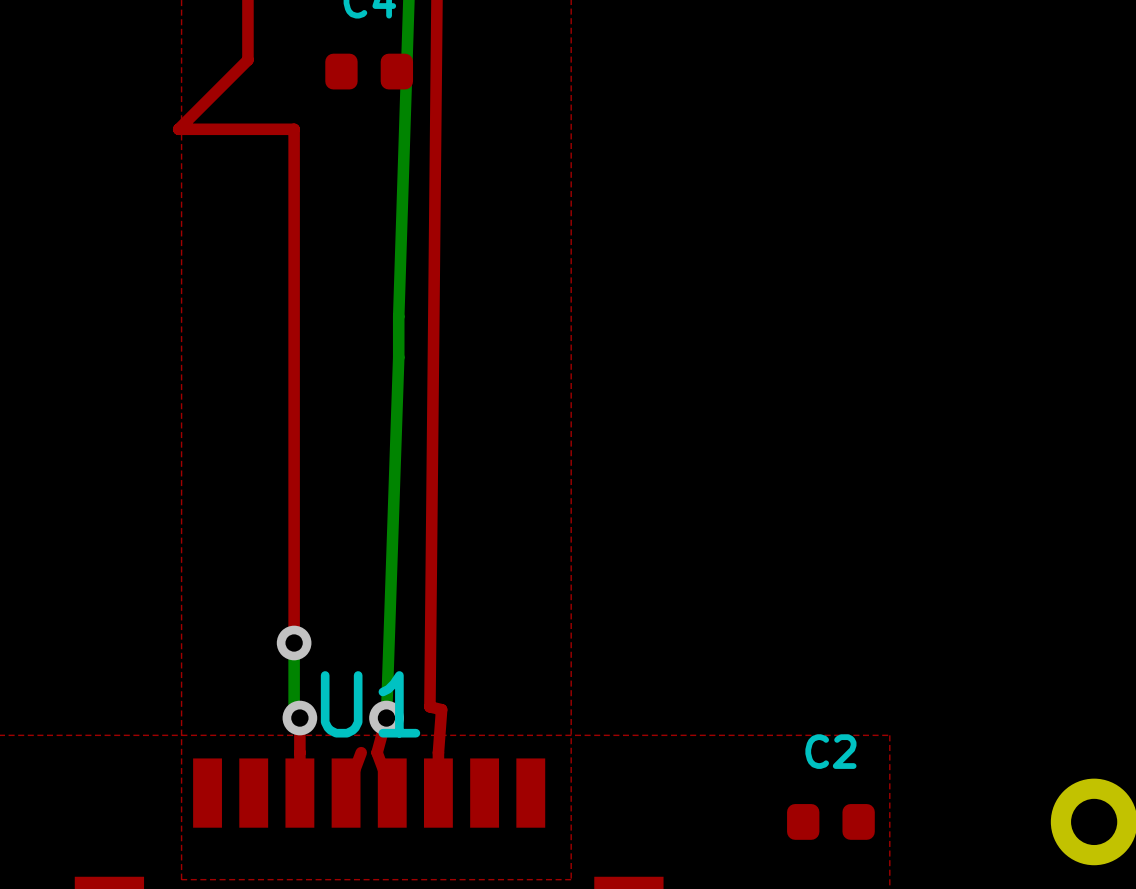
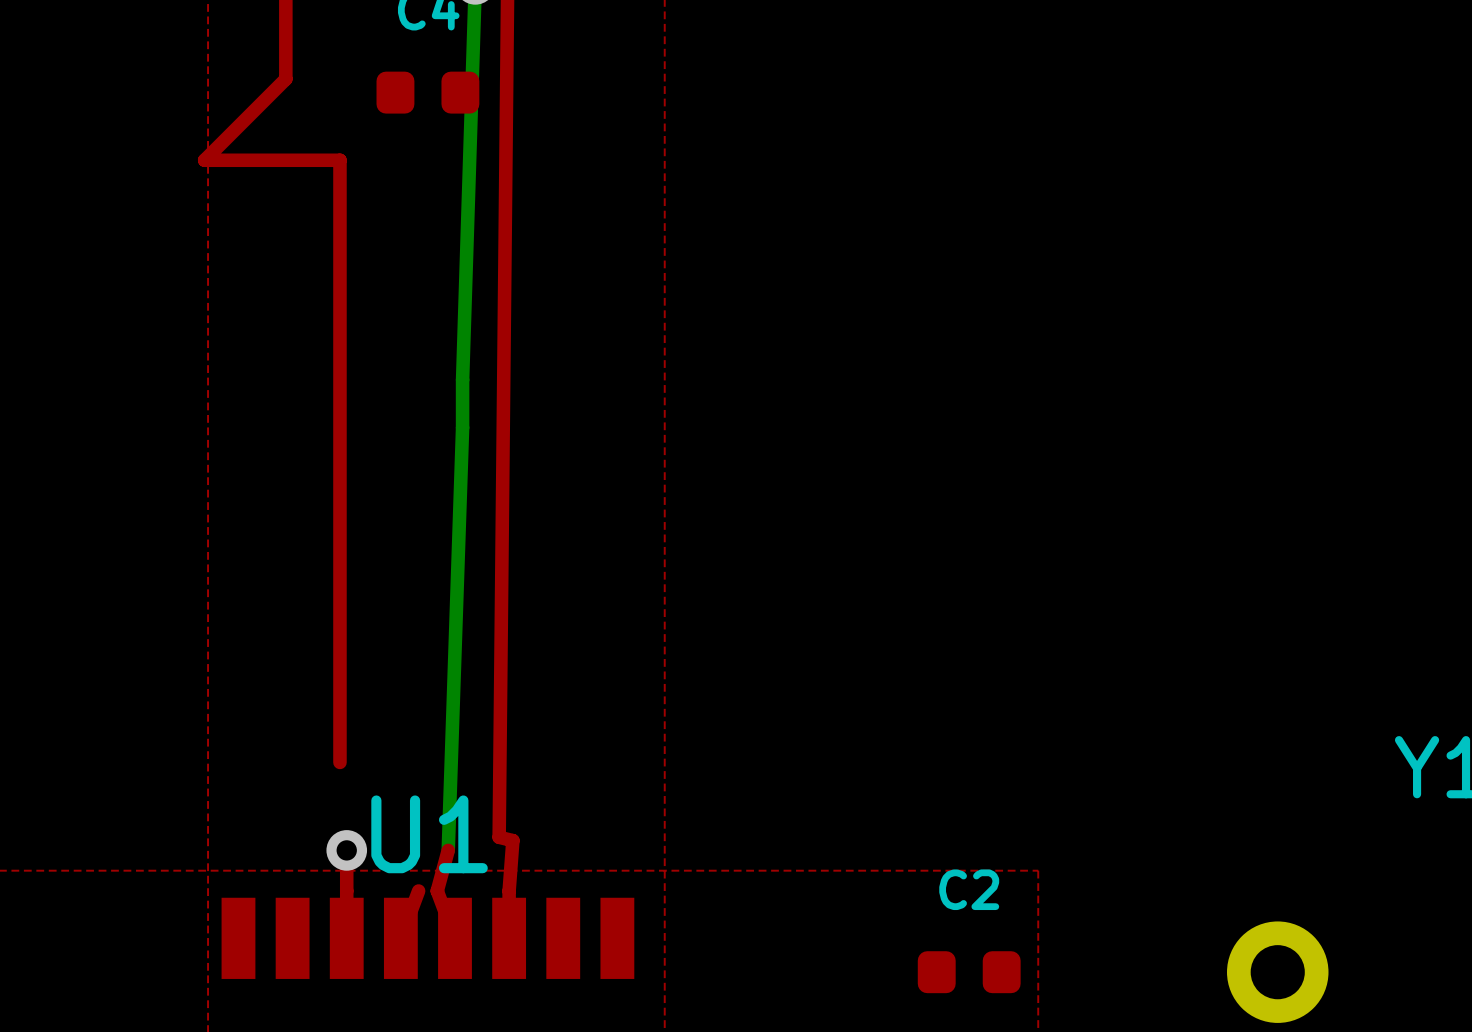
bottom track: (294, 643) (294, 712) (299, 718) -> none
via: (294, 643) -> none
via: (386, 718) -> none

